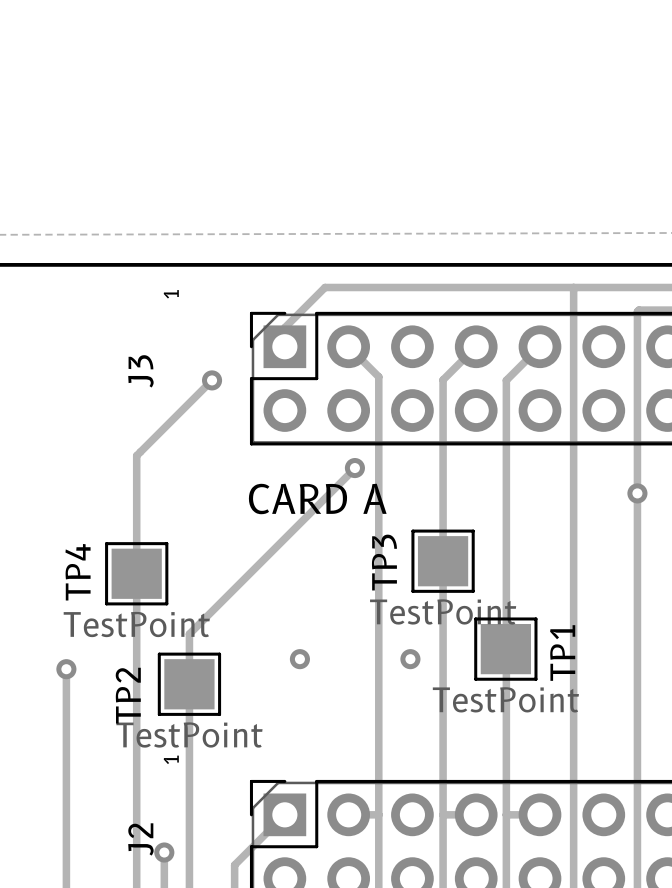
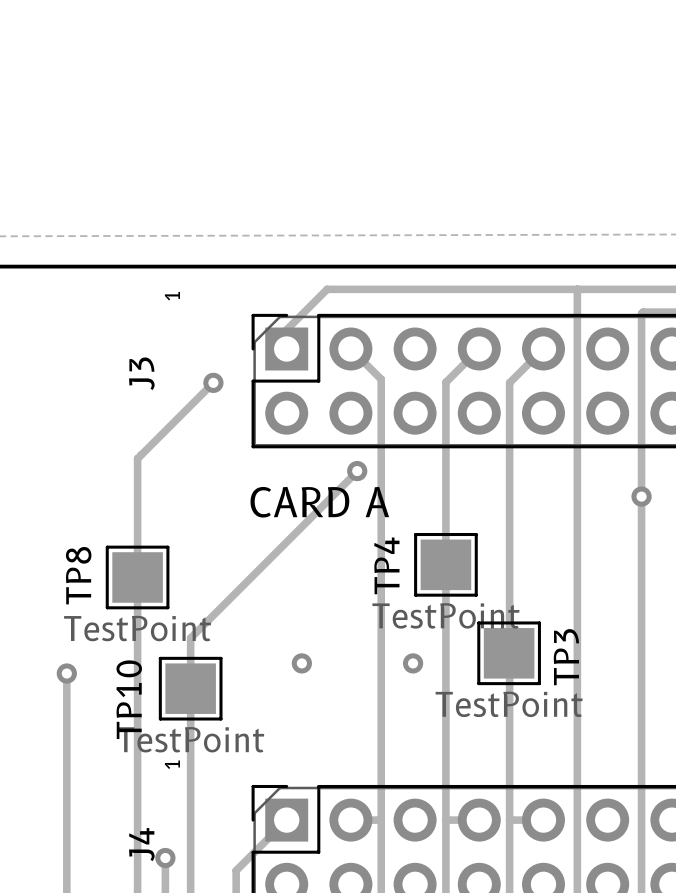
TP3 name: TP3 (384, 562) -> TP4 (386, 565)
TP4 name: TP4 (78, 572) -> TP8 (78, 575)
TP1 name: TP1 (562, 653) -> TP3 (566, 657)
TP2 name: TP2 (128, 695) -> TP10 (129, 699)
J2 name: J2 (140, 839) -> J4 (141, 844)

